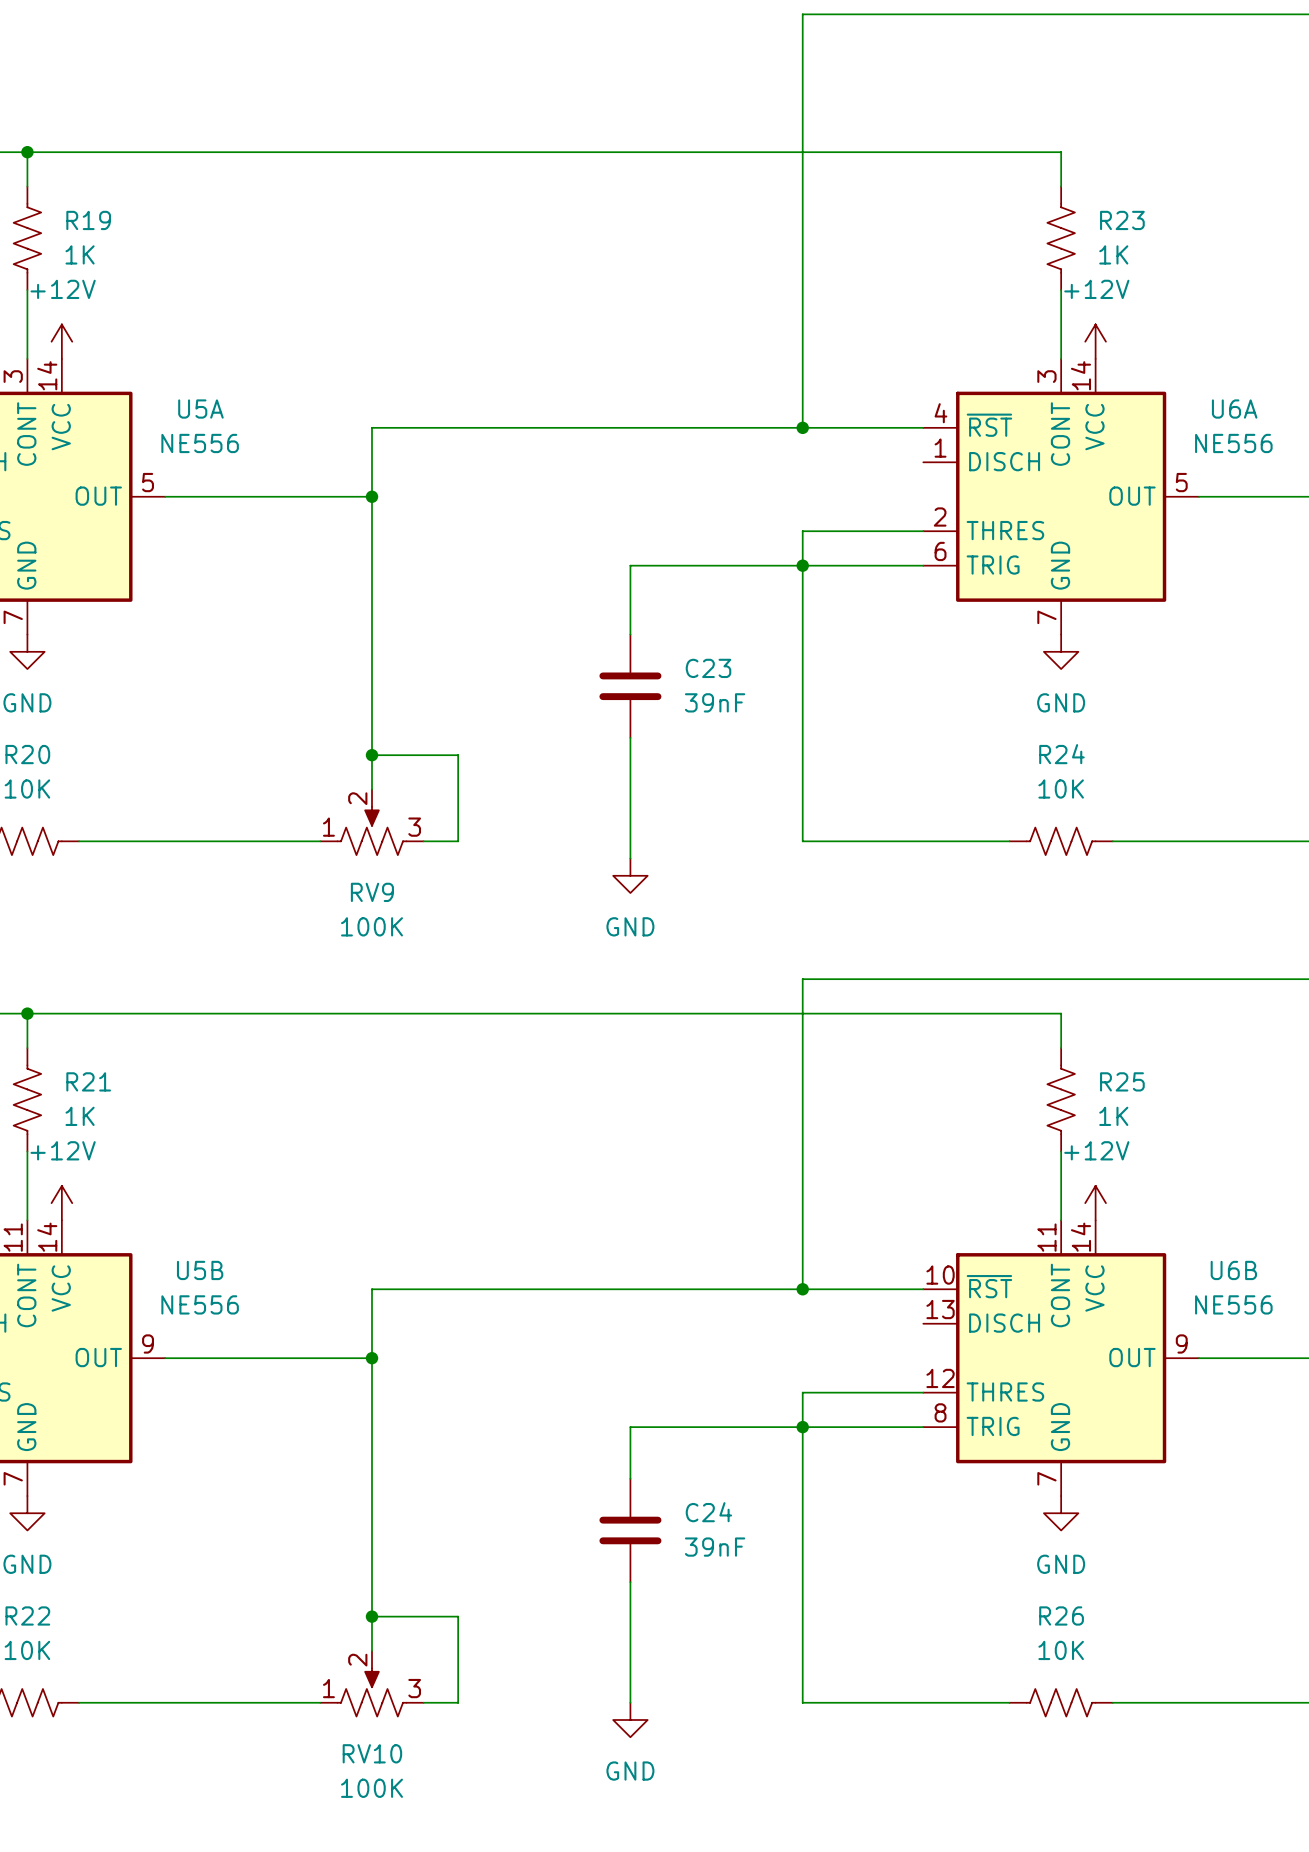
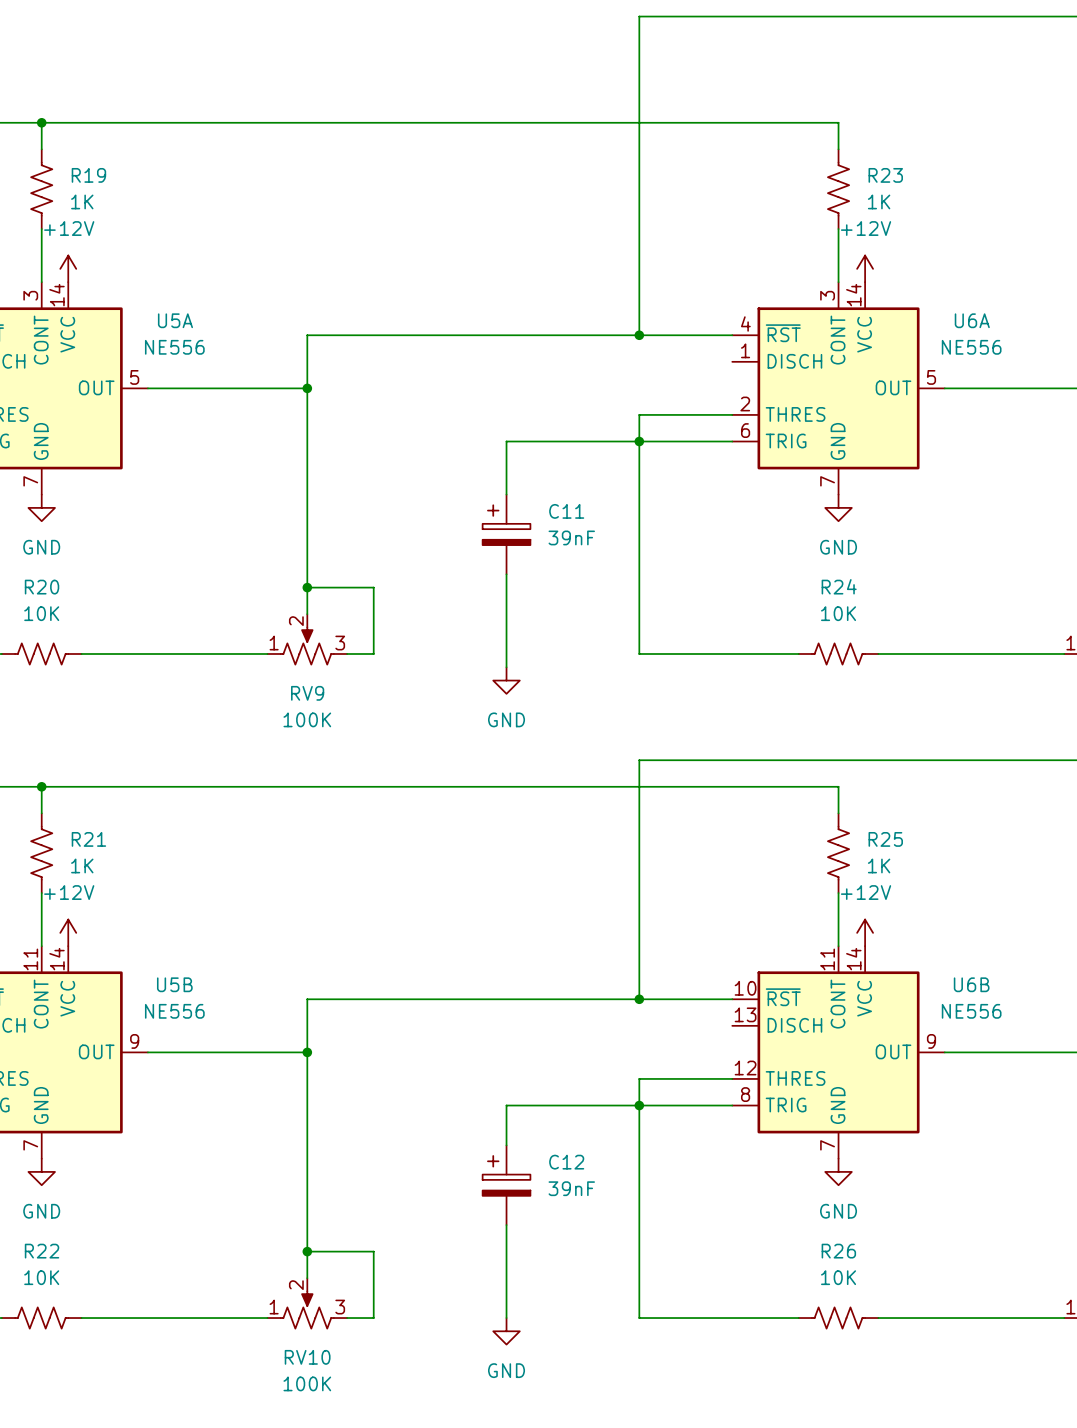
C23: 39nF (630, 686) -> none
C11: none -> 39nF (506, 534)
C24: 39nF (630, 1530) -> none
C12: none -> 39nF (506, 1185)

